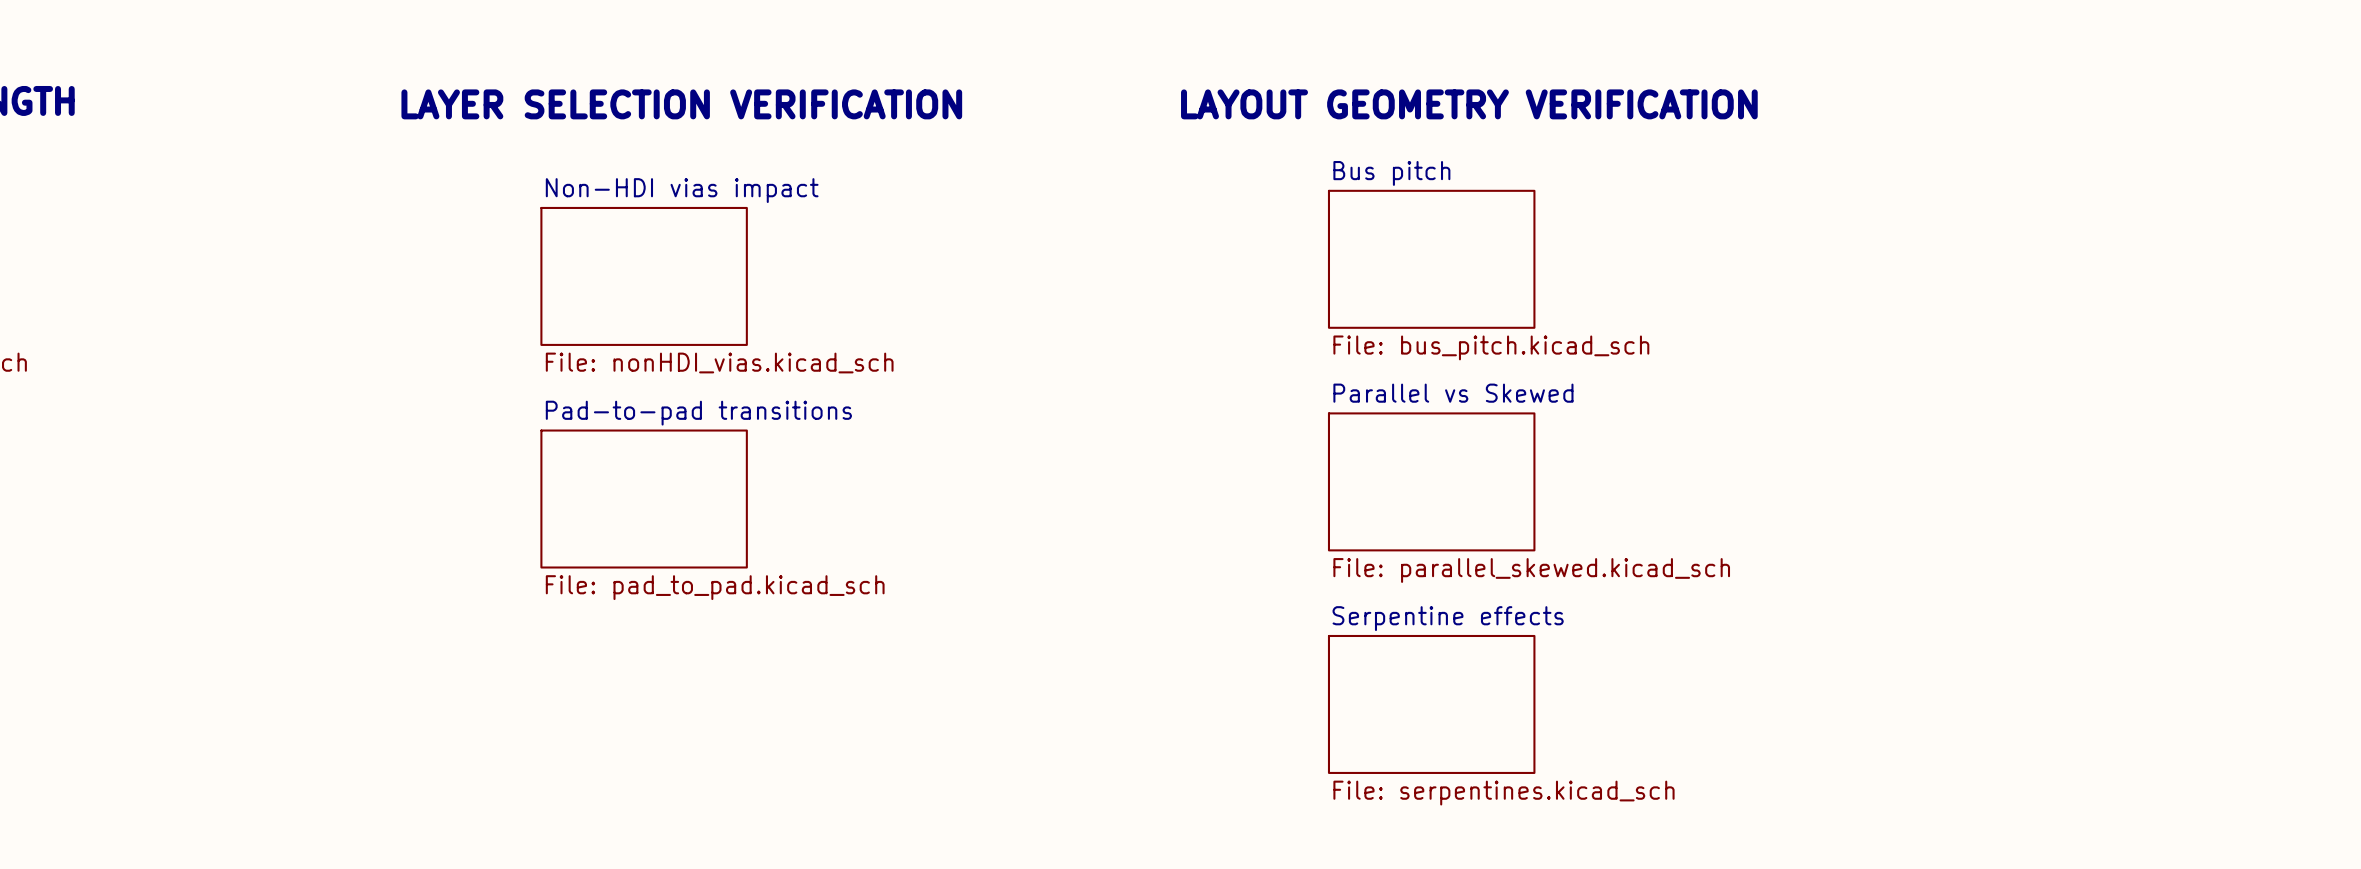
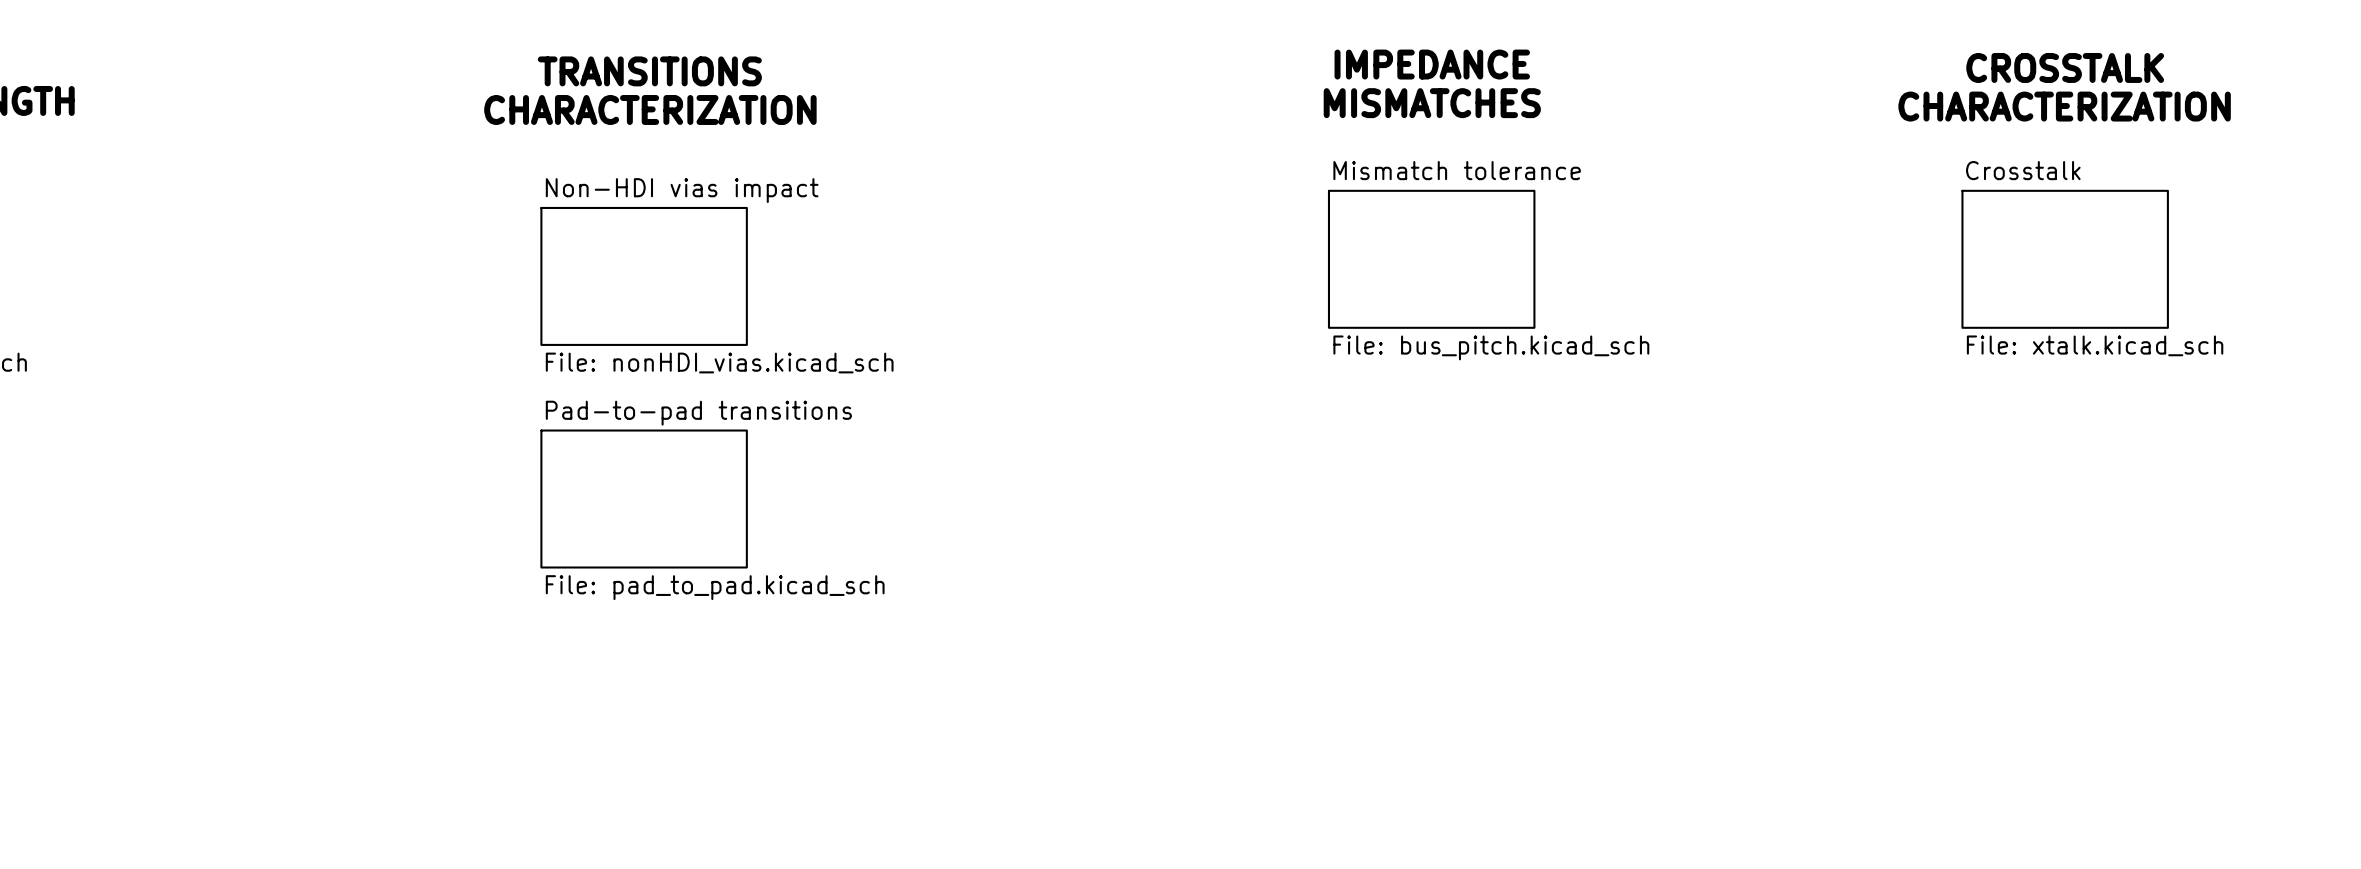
text: none -> IMPEDANCE (1432, 64)
text: none -> CROSSTALK (2065, 67)
text: none -> TRANSITIONS (649, 71)
text: none -> MISMATCHES (1432, 103)
text: LAYER SELECTION VERIFICATION (681, 104) -> none
text: LAYOUT GEOMETRY VERIFICATION (1469, 104) -> none
text: none -> CHARACTERIZATION (2064, 106)
text: none -> CHARACTERIZATION (650, 109)
sheet Bus pitch name: Bus pitch (1391, 173) -> Mismatch tolerance (1457, 170)
sheet Crosstalk: none -> File: xtalk.kicad_sch (2065, 259)
sheet Parallel vs Skewed: File: parallel_skewed.kicad_sch (1431, 481) -> none
sheet Serpentine effects: File: serpentines.kicad_sch (1431, 704) -> none

